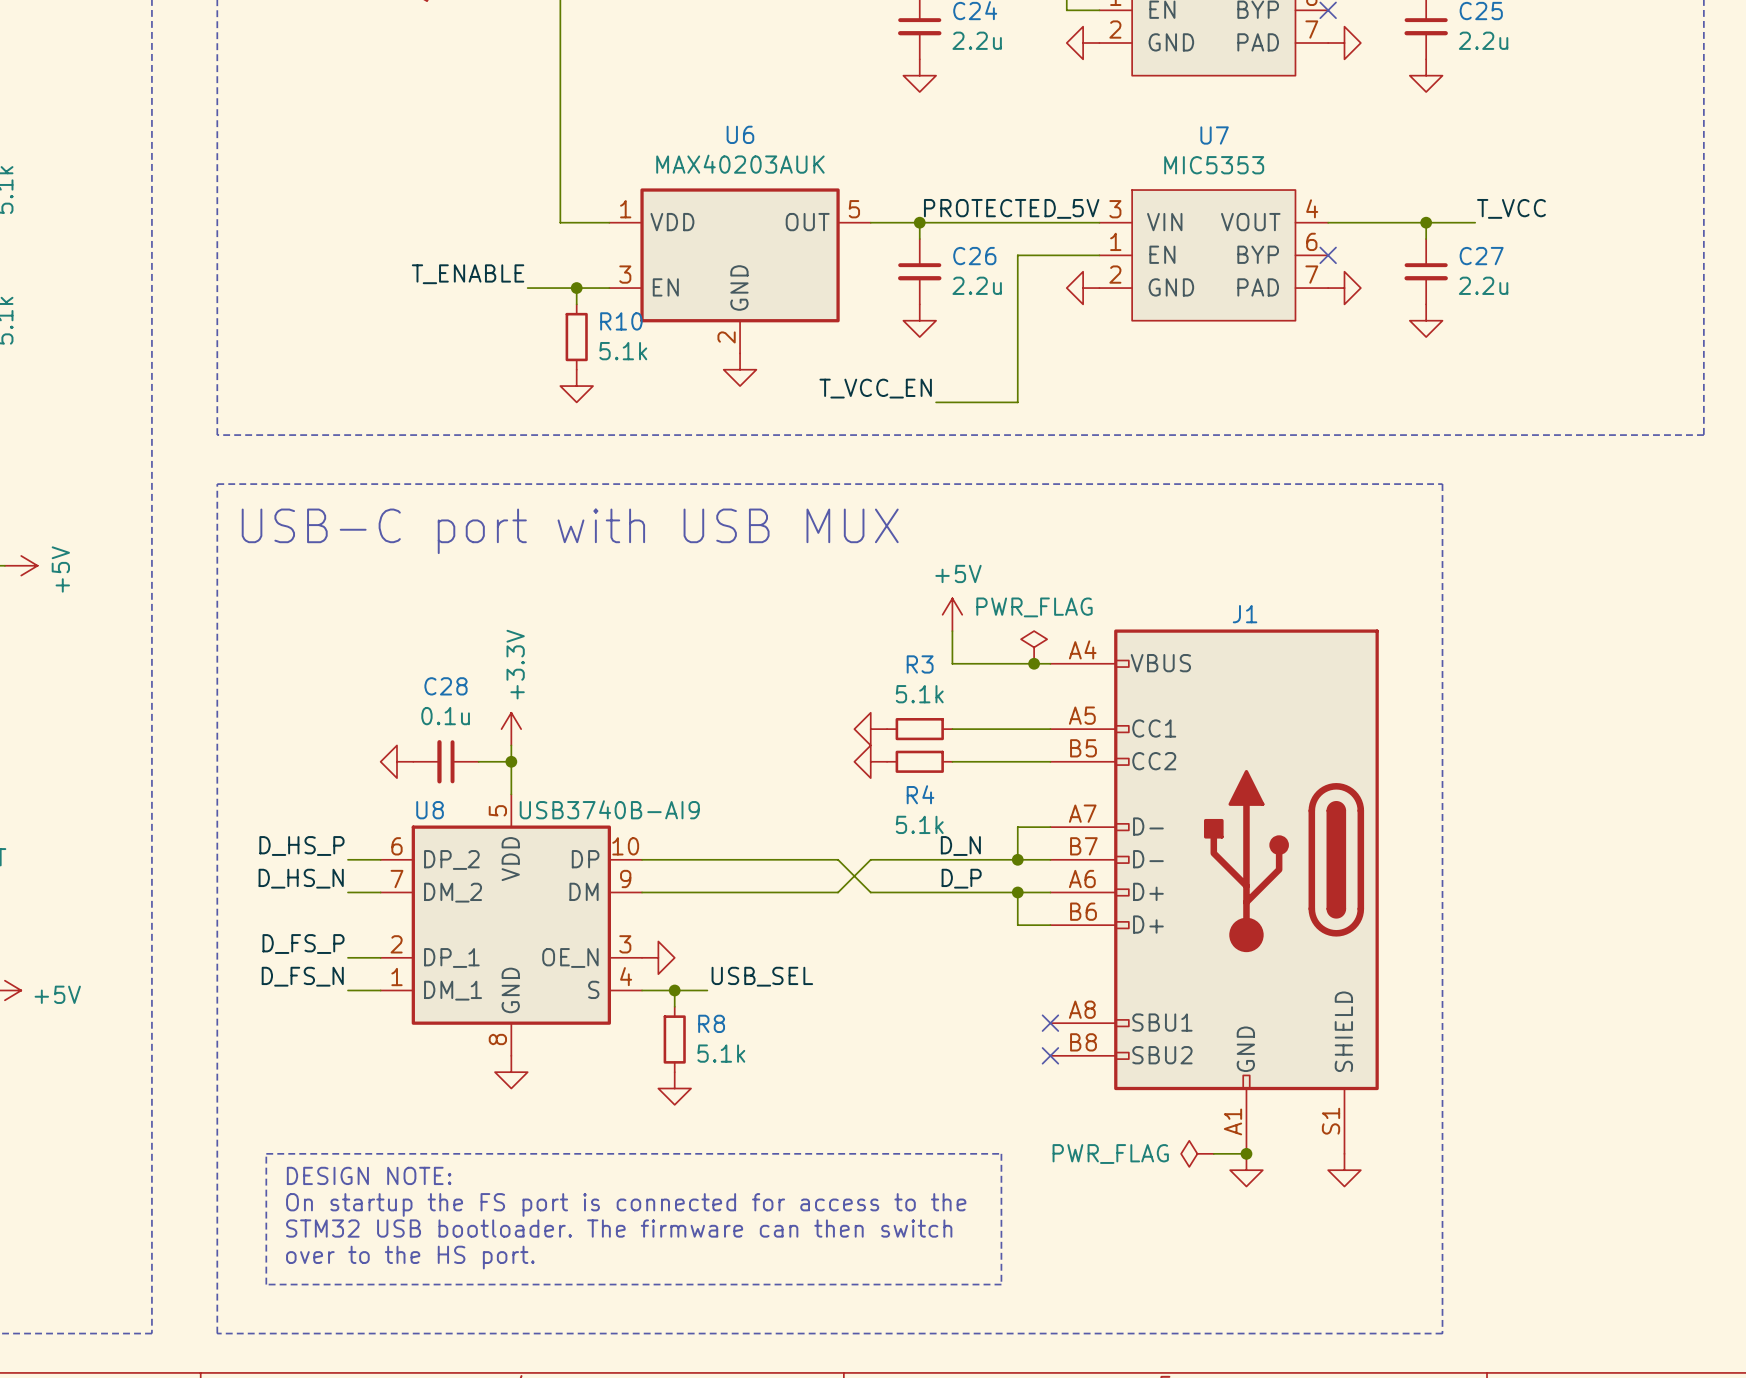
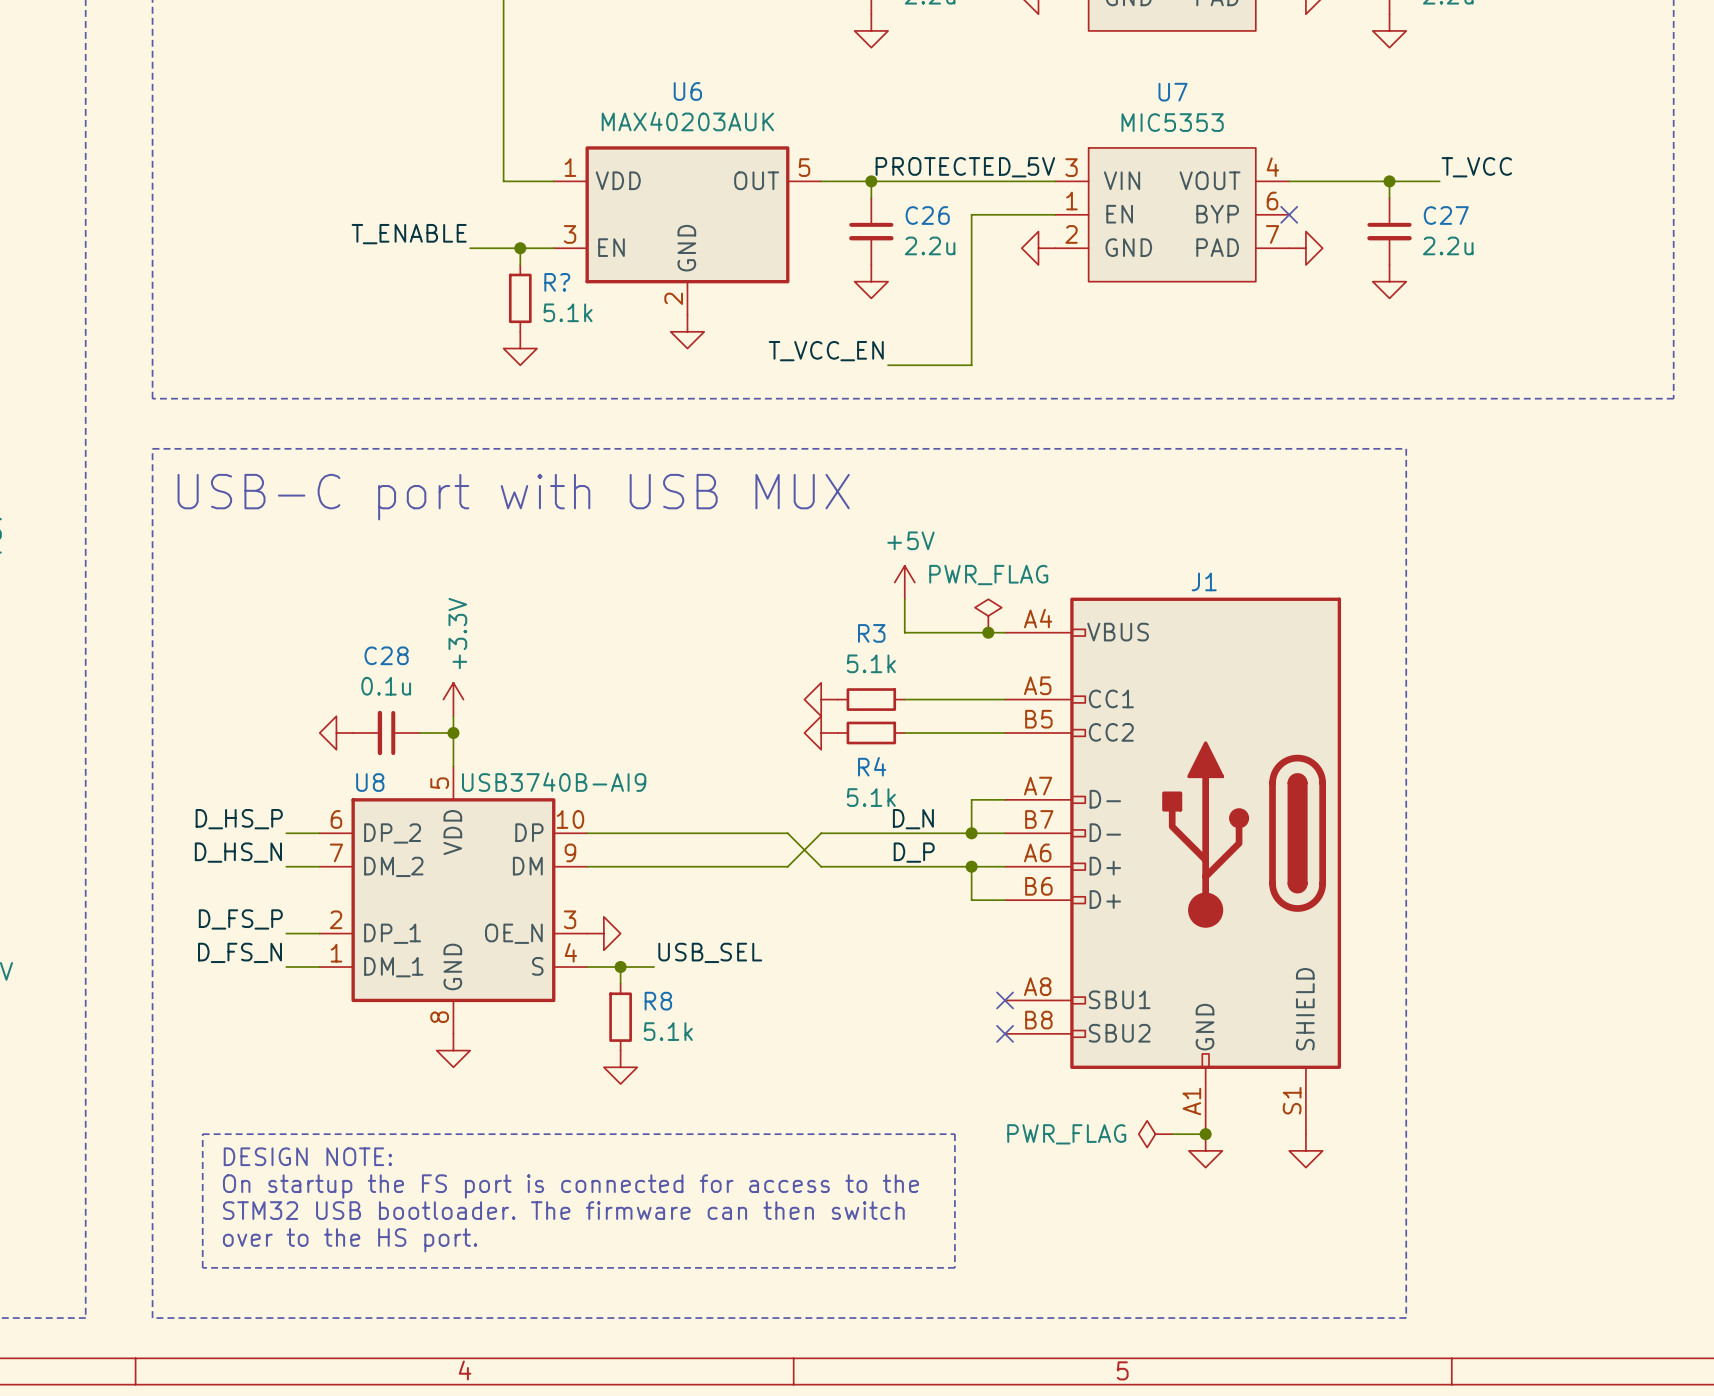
R10 name: R10 (621, 321) -> R? (557, 282)

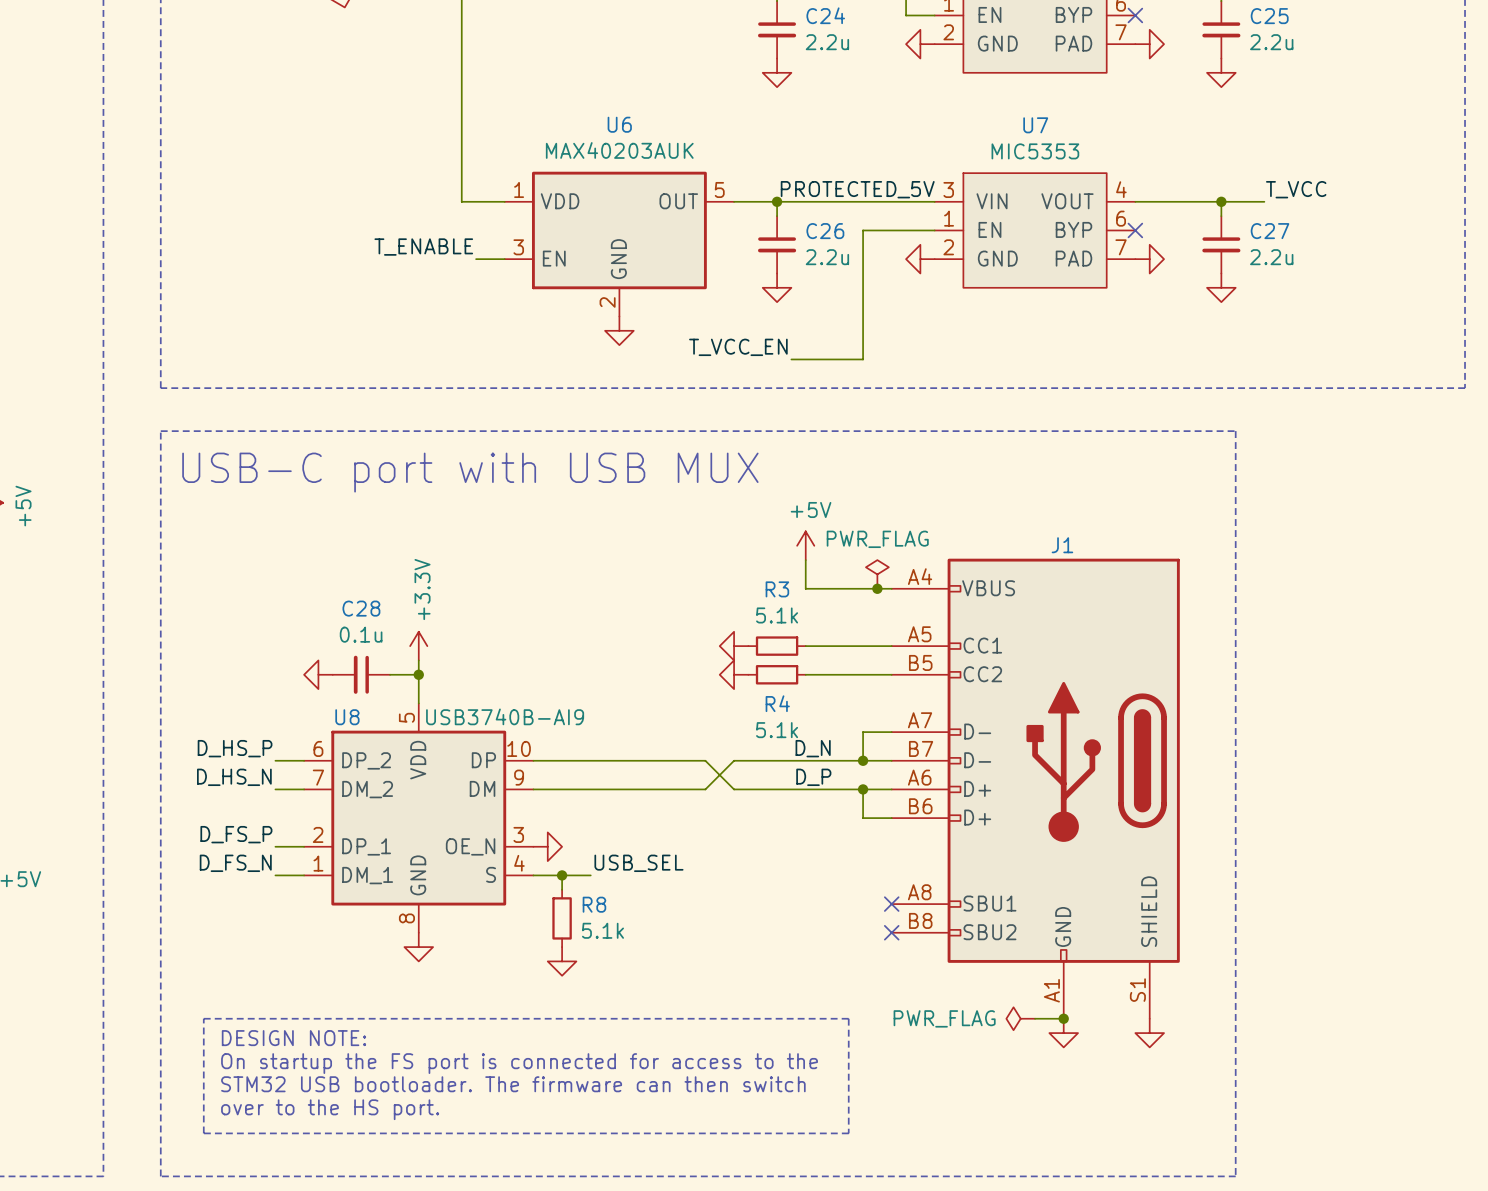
label position: T_ENABLE (409, 234) -> T_ENABLE (423, 247)
wire: (470, 248) (520, 248) (520, 264) -> none
junction: (520, 248) -> none
R?: 5.1k (520, 298) -> none
power symbol: (520, 348) -> none

